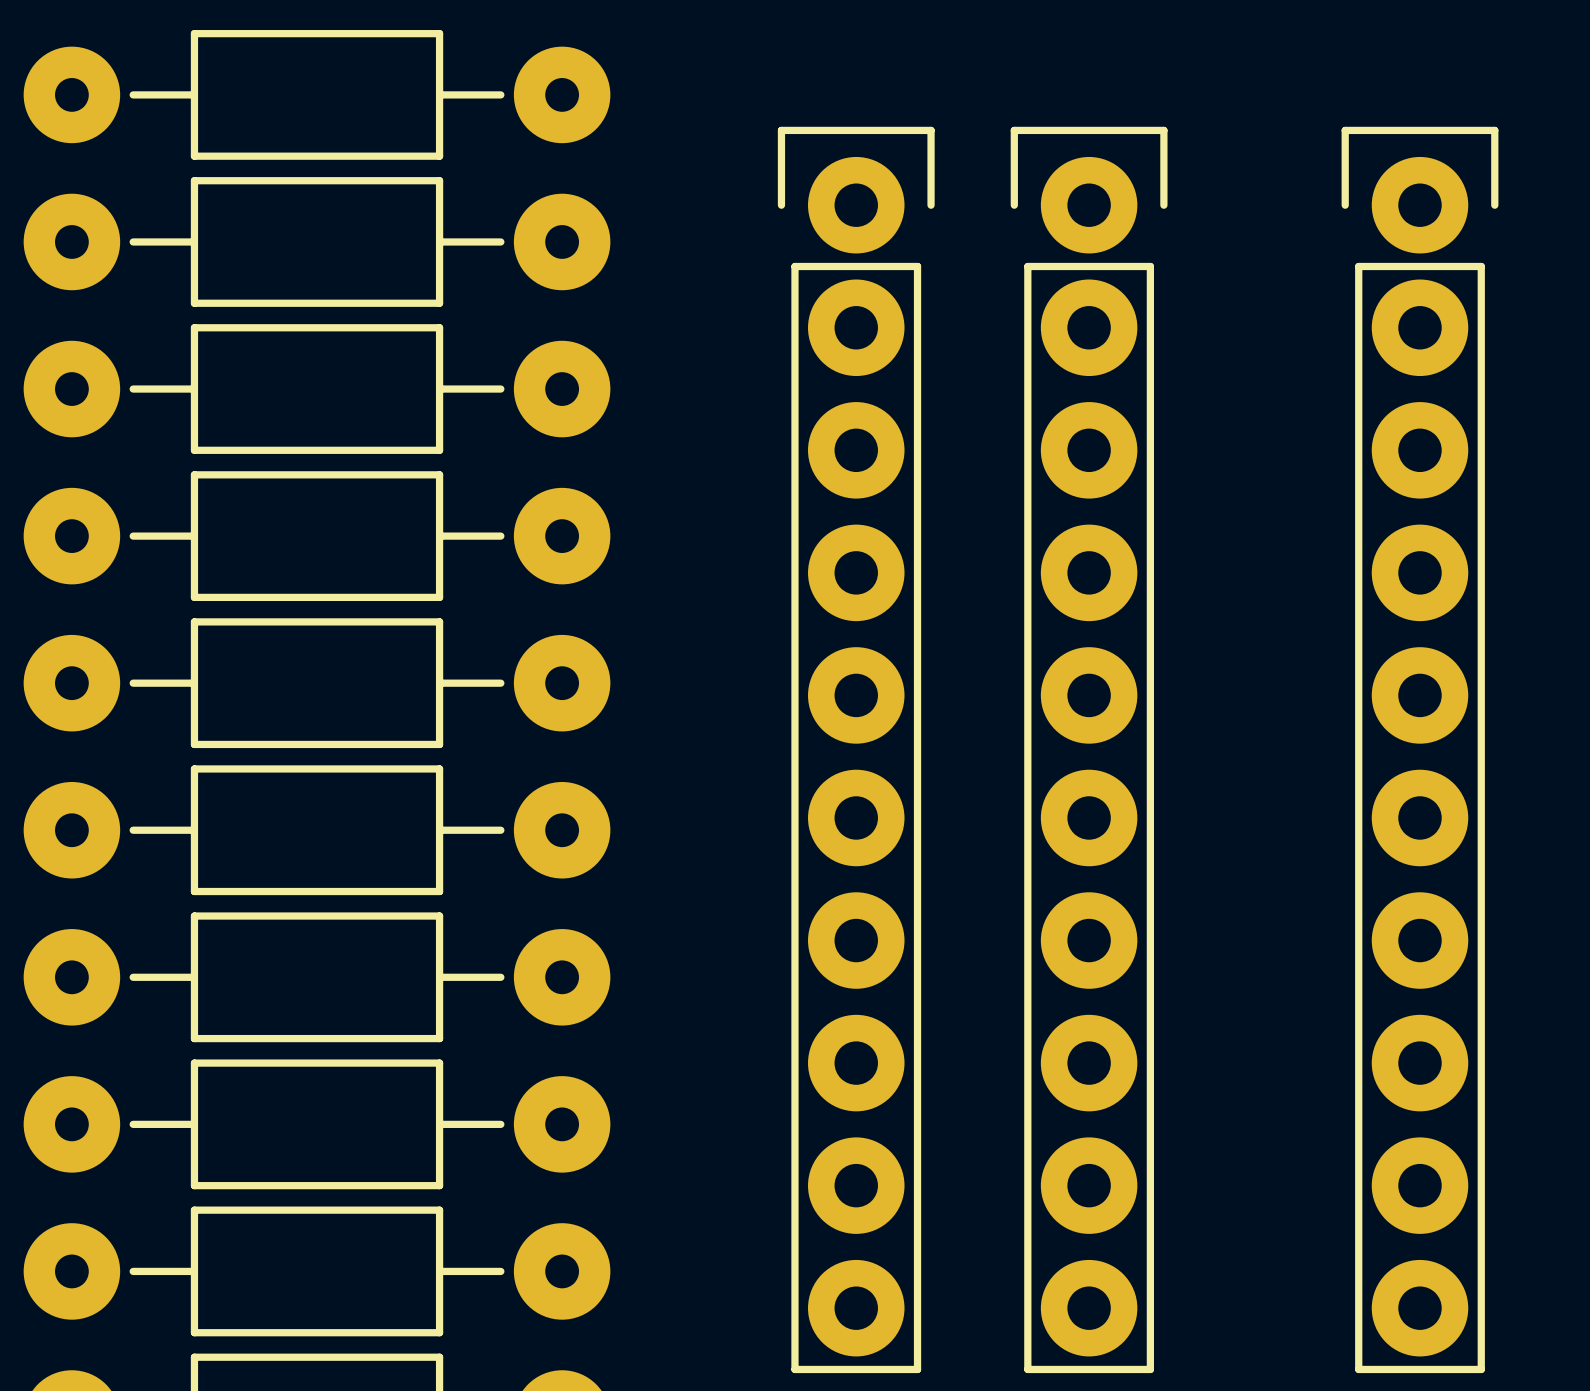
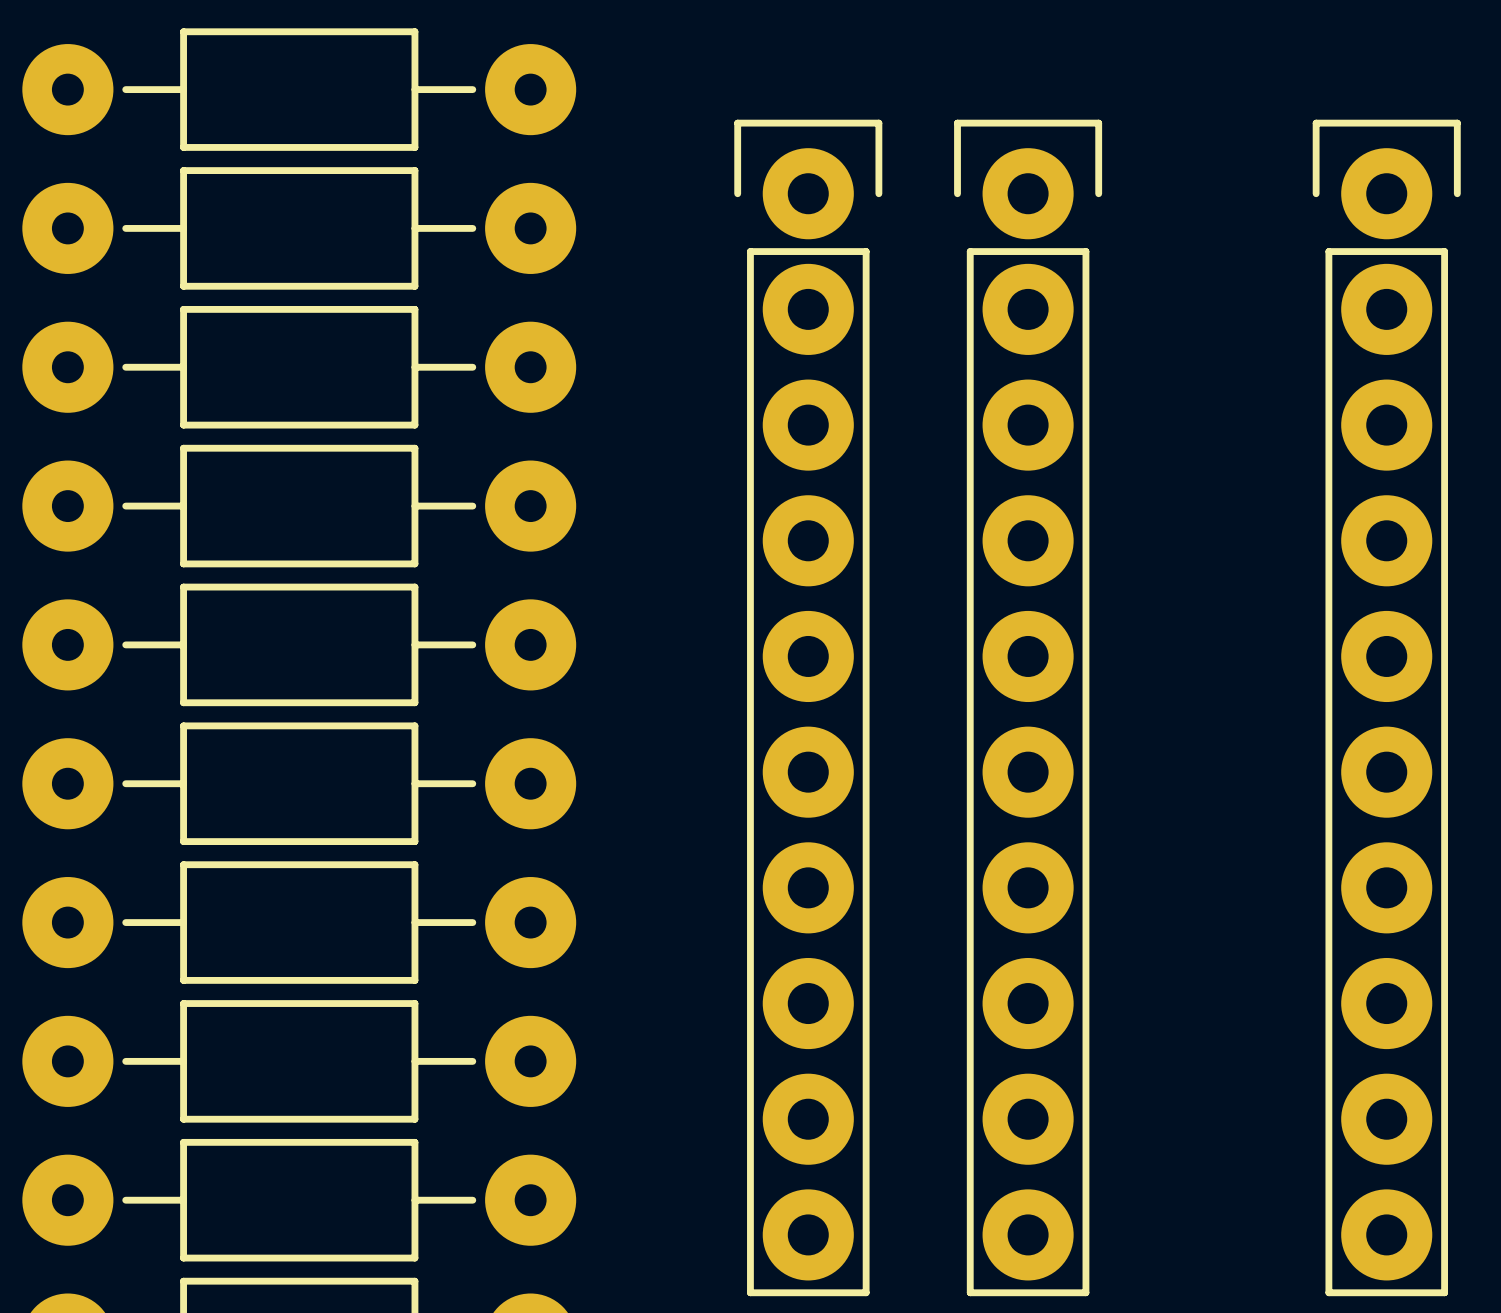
part position: (1420, 749) -> (1386, 707)

